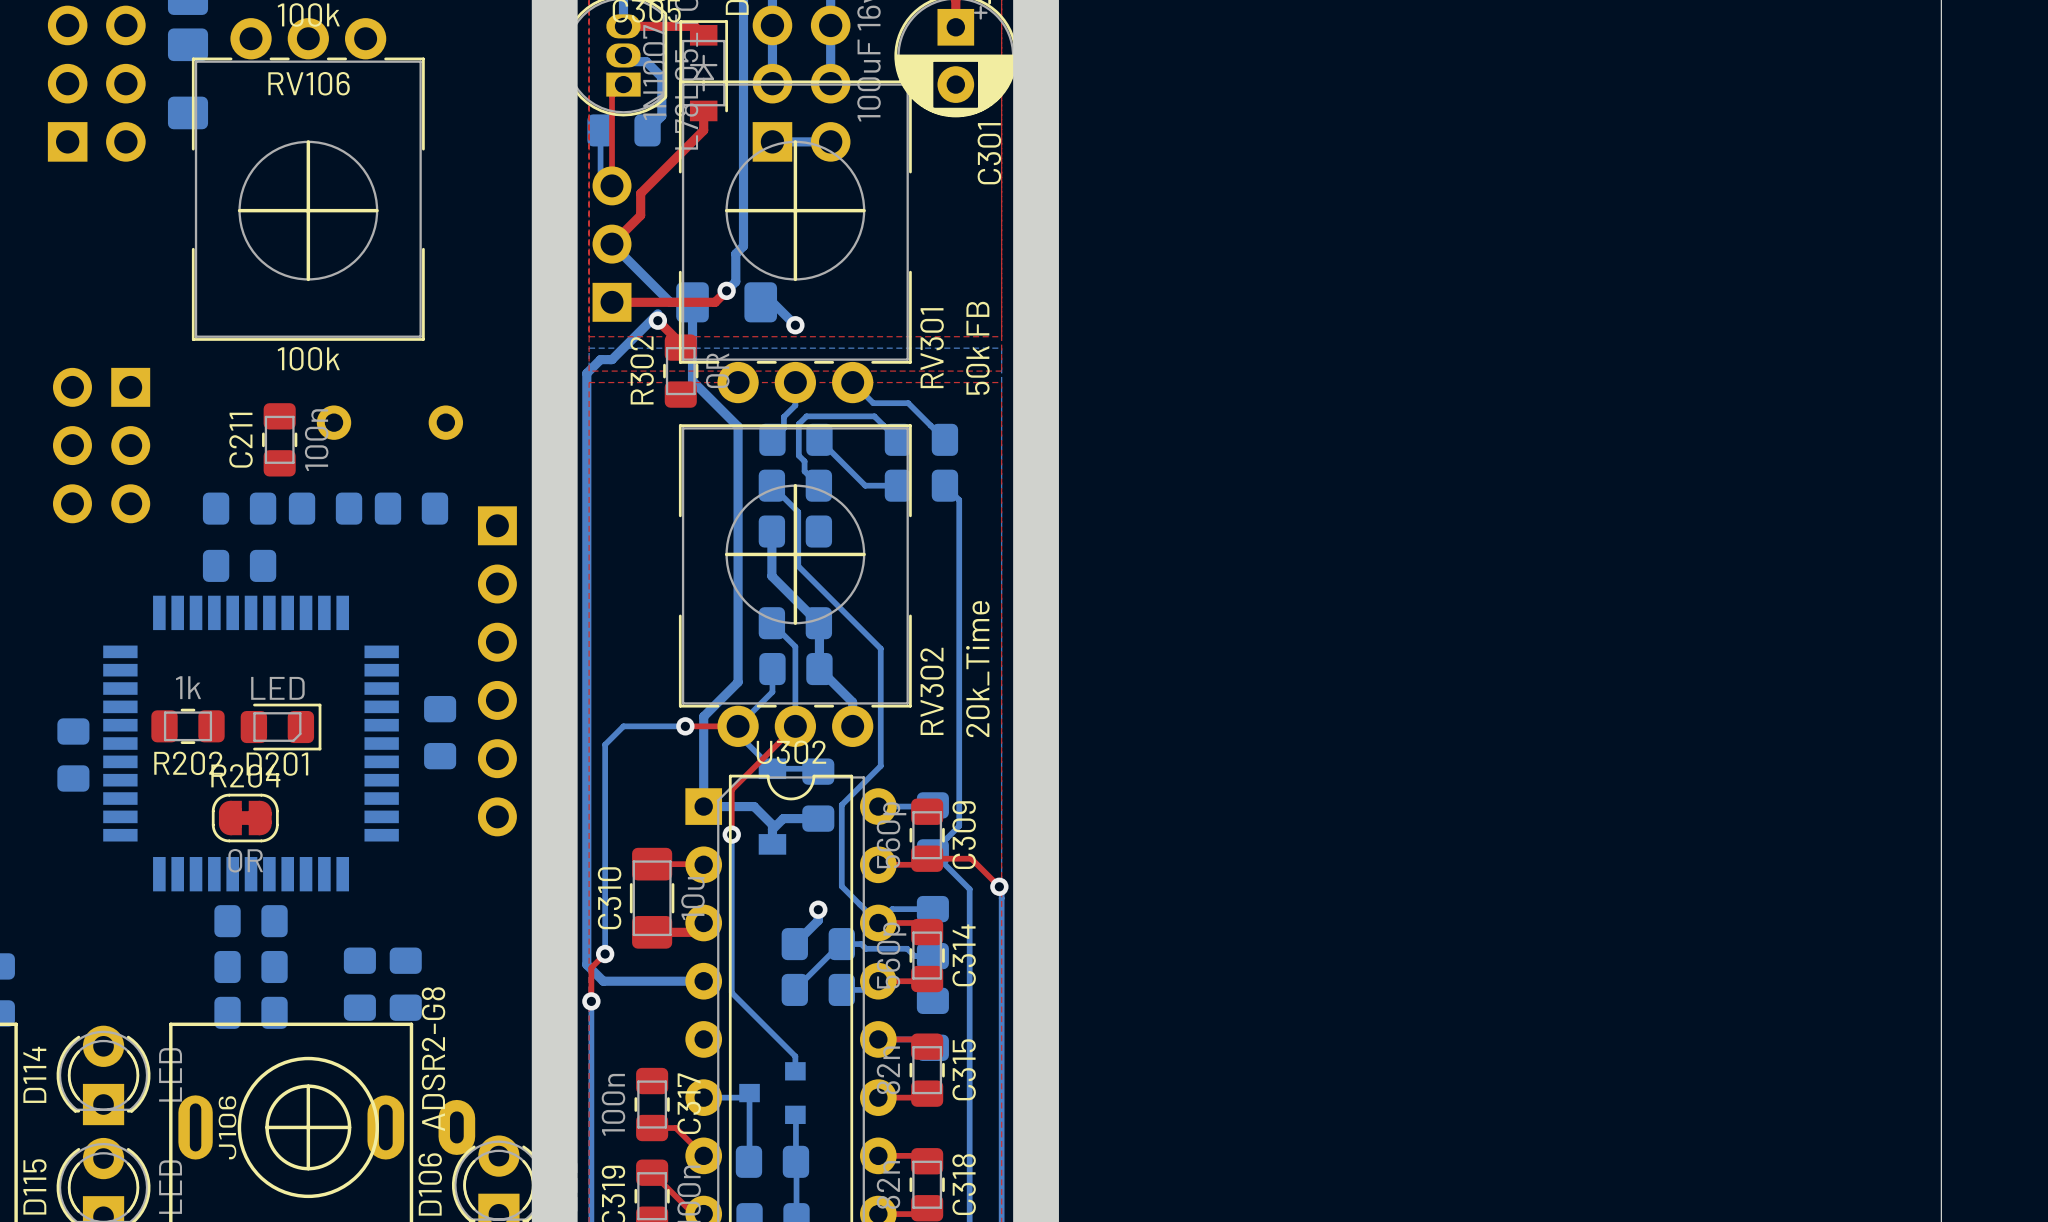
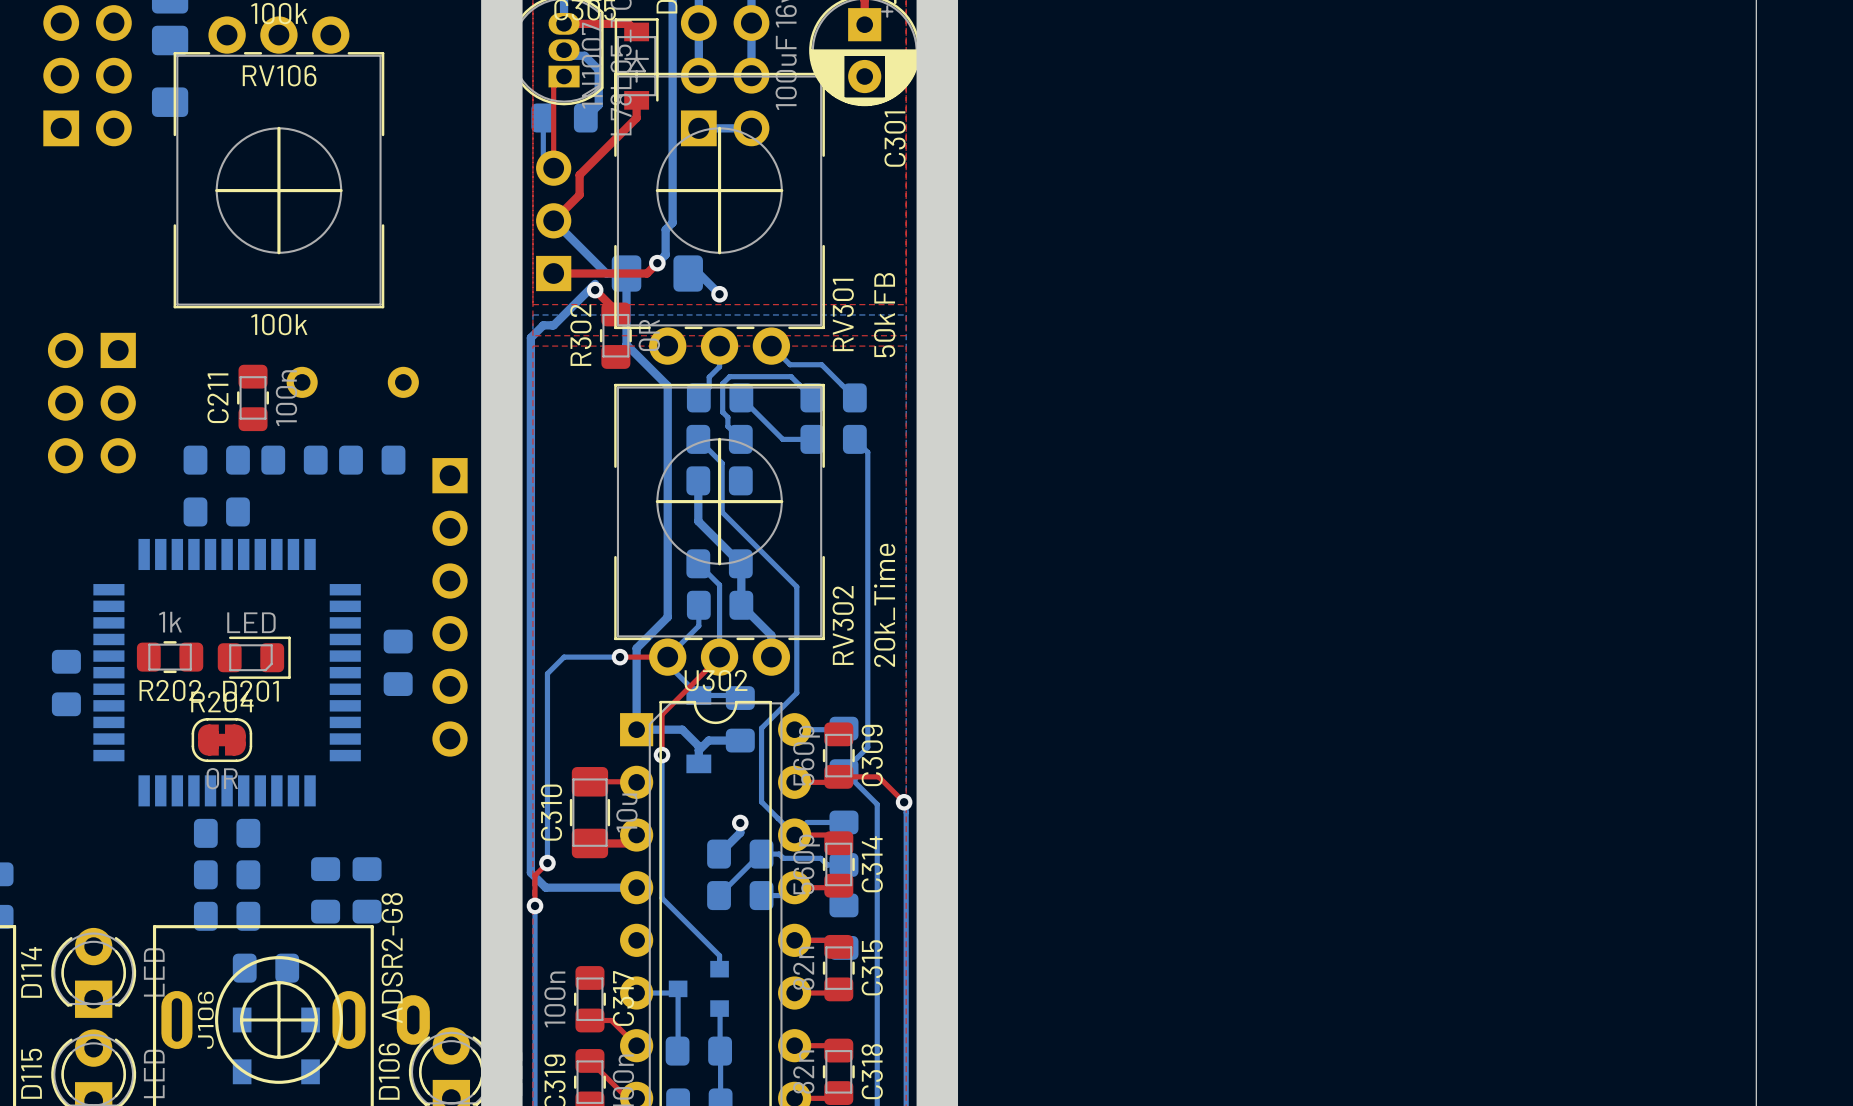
part: none -> (265, 968)
part: none -> (276, 1019)
part: none -> (276, 1071)

